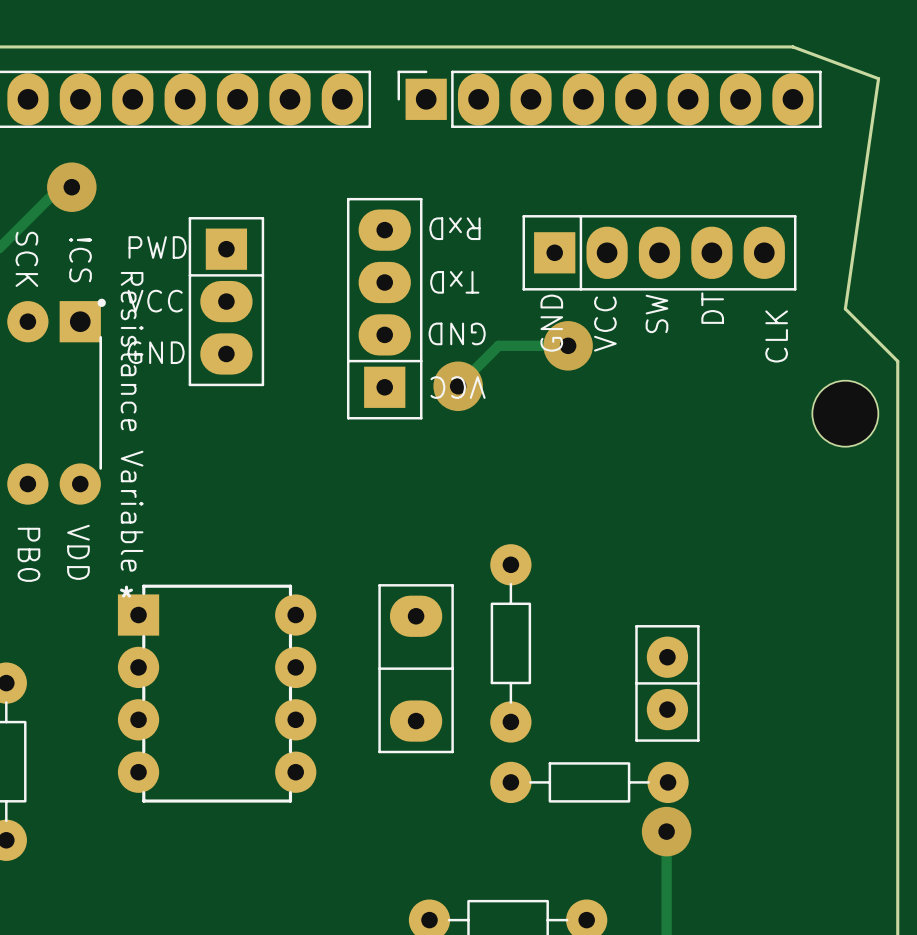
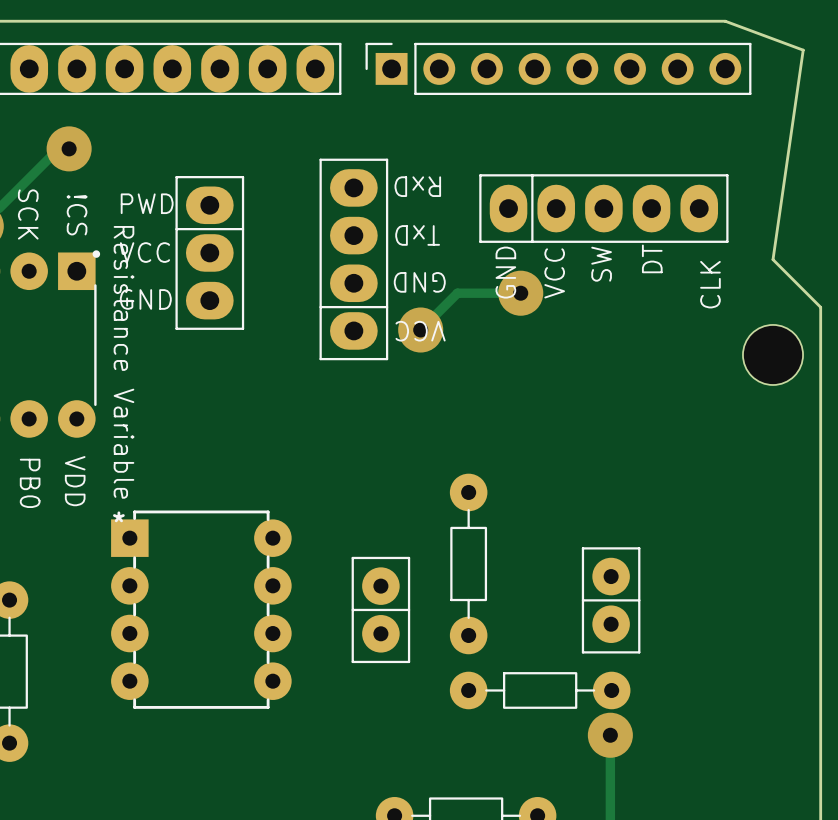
part footprint: [397, 70, 822, 129] -> [365, 42, 752, 96]
part footprint: [346, 197, 423, 420] -> [319, 158, 389, 361]
part footprint: [522, 215, 797, 291] -> [479, 174, 729, 243]
part footprint: [188, 217, 265, 387] -> [175, 176, 245, 330]
part: (416, 668) -> none
part: none -> (380, 609)

